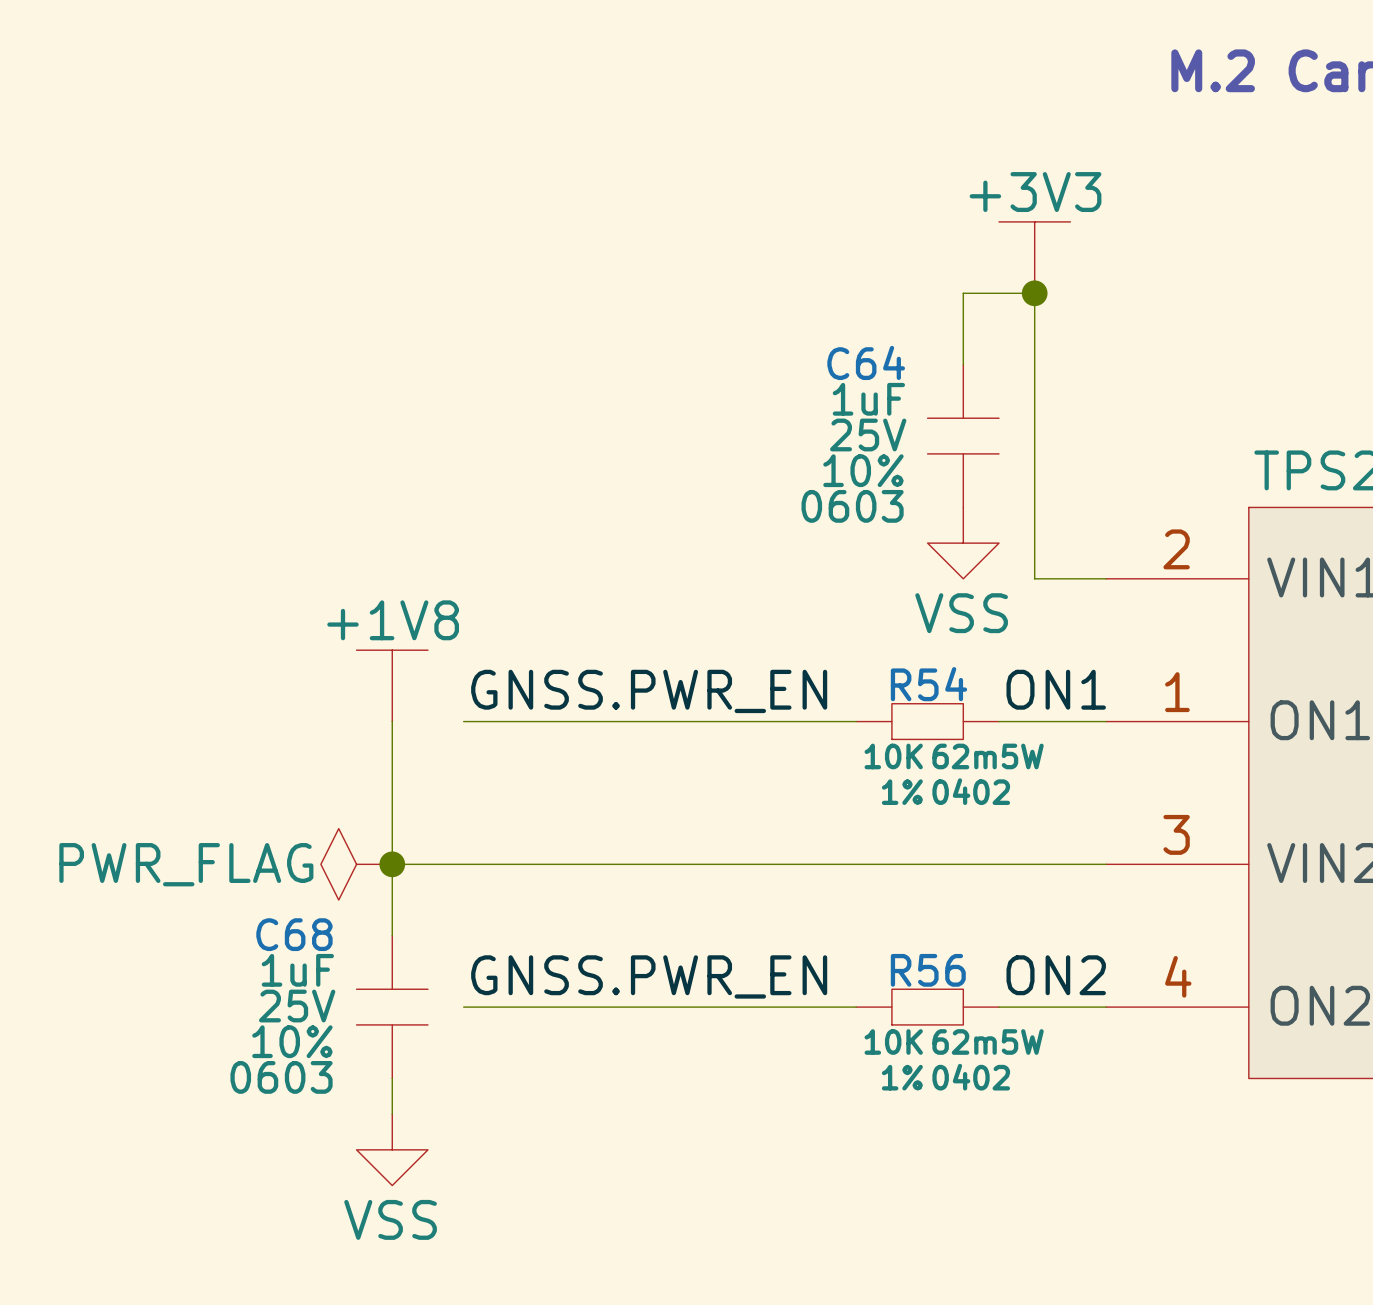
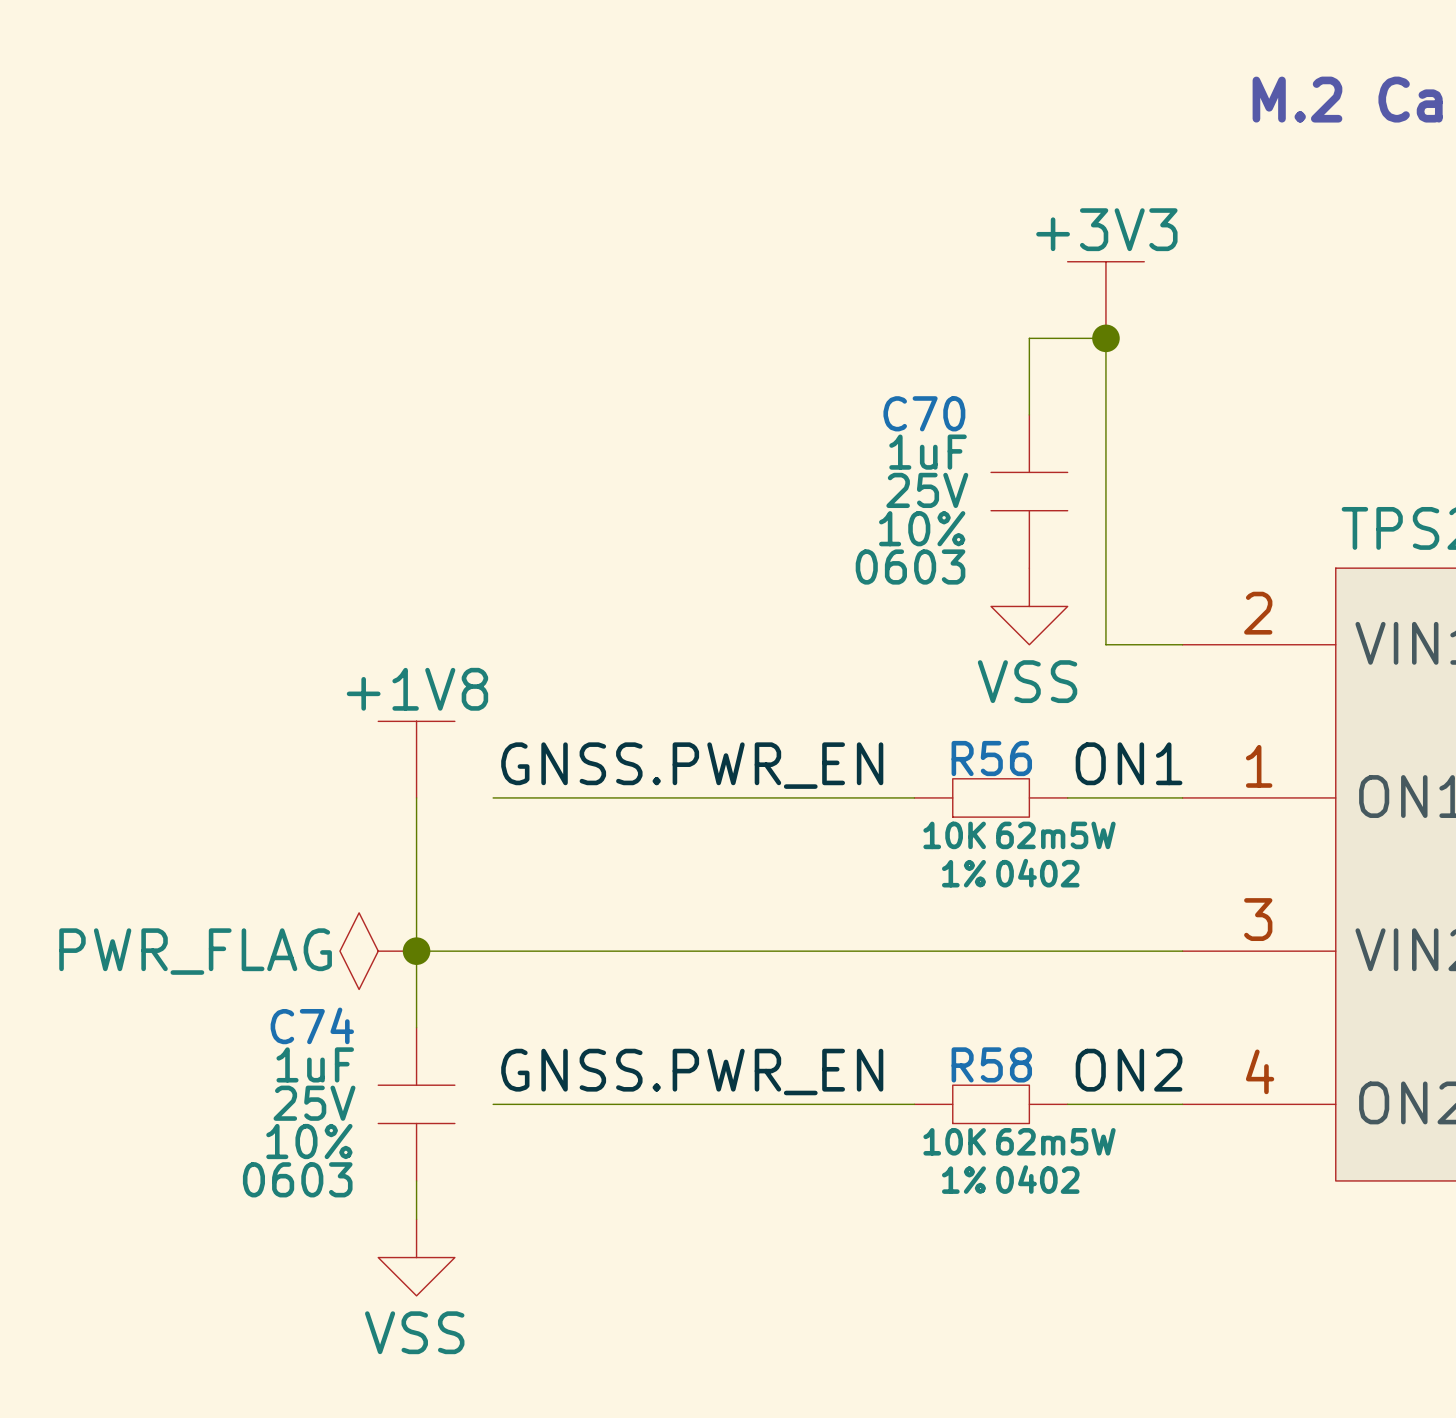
C64 name: C64 (866, 362) -> C70 (924, 413)
R54 name: R54 (928, 684) -> R56 (991, 758)
C68 name: C68 (294, 934) -> C74 (312, 1025)
R56 name: R56 (928, 970) -> R58 (991, 1064)

